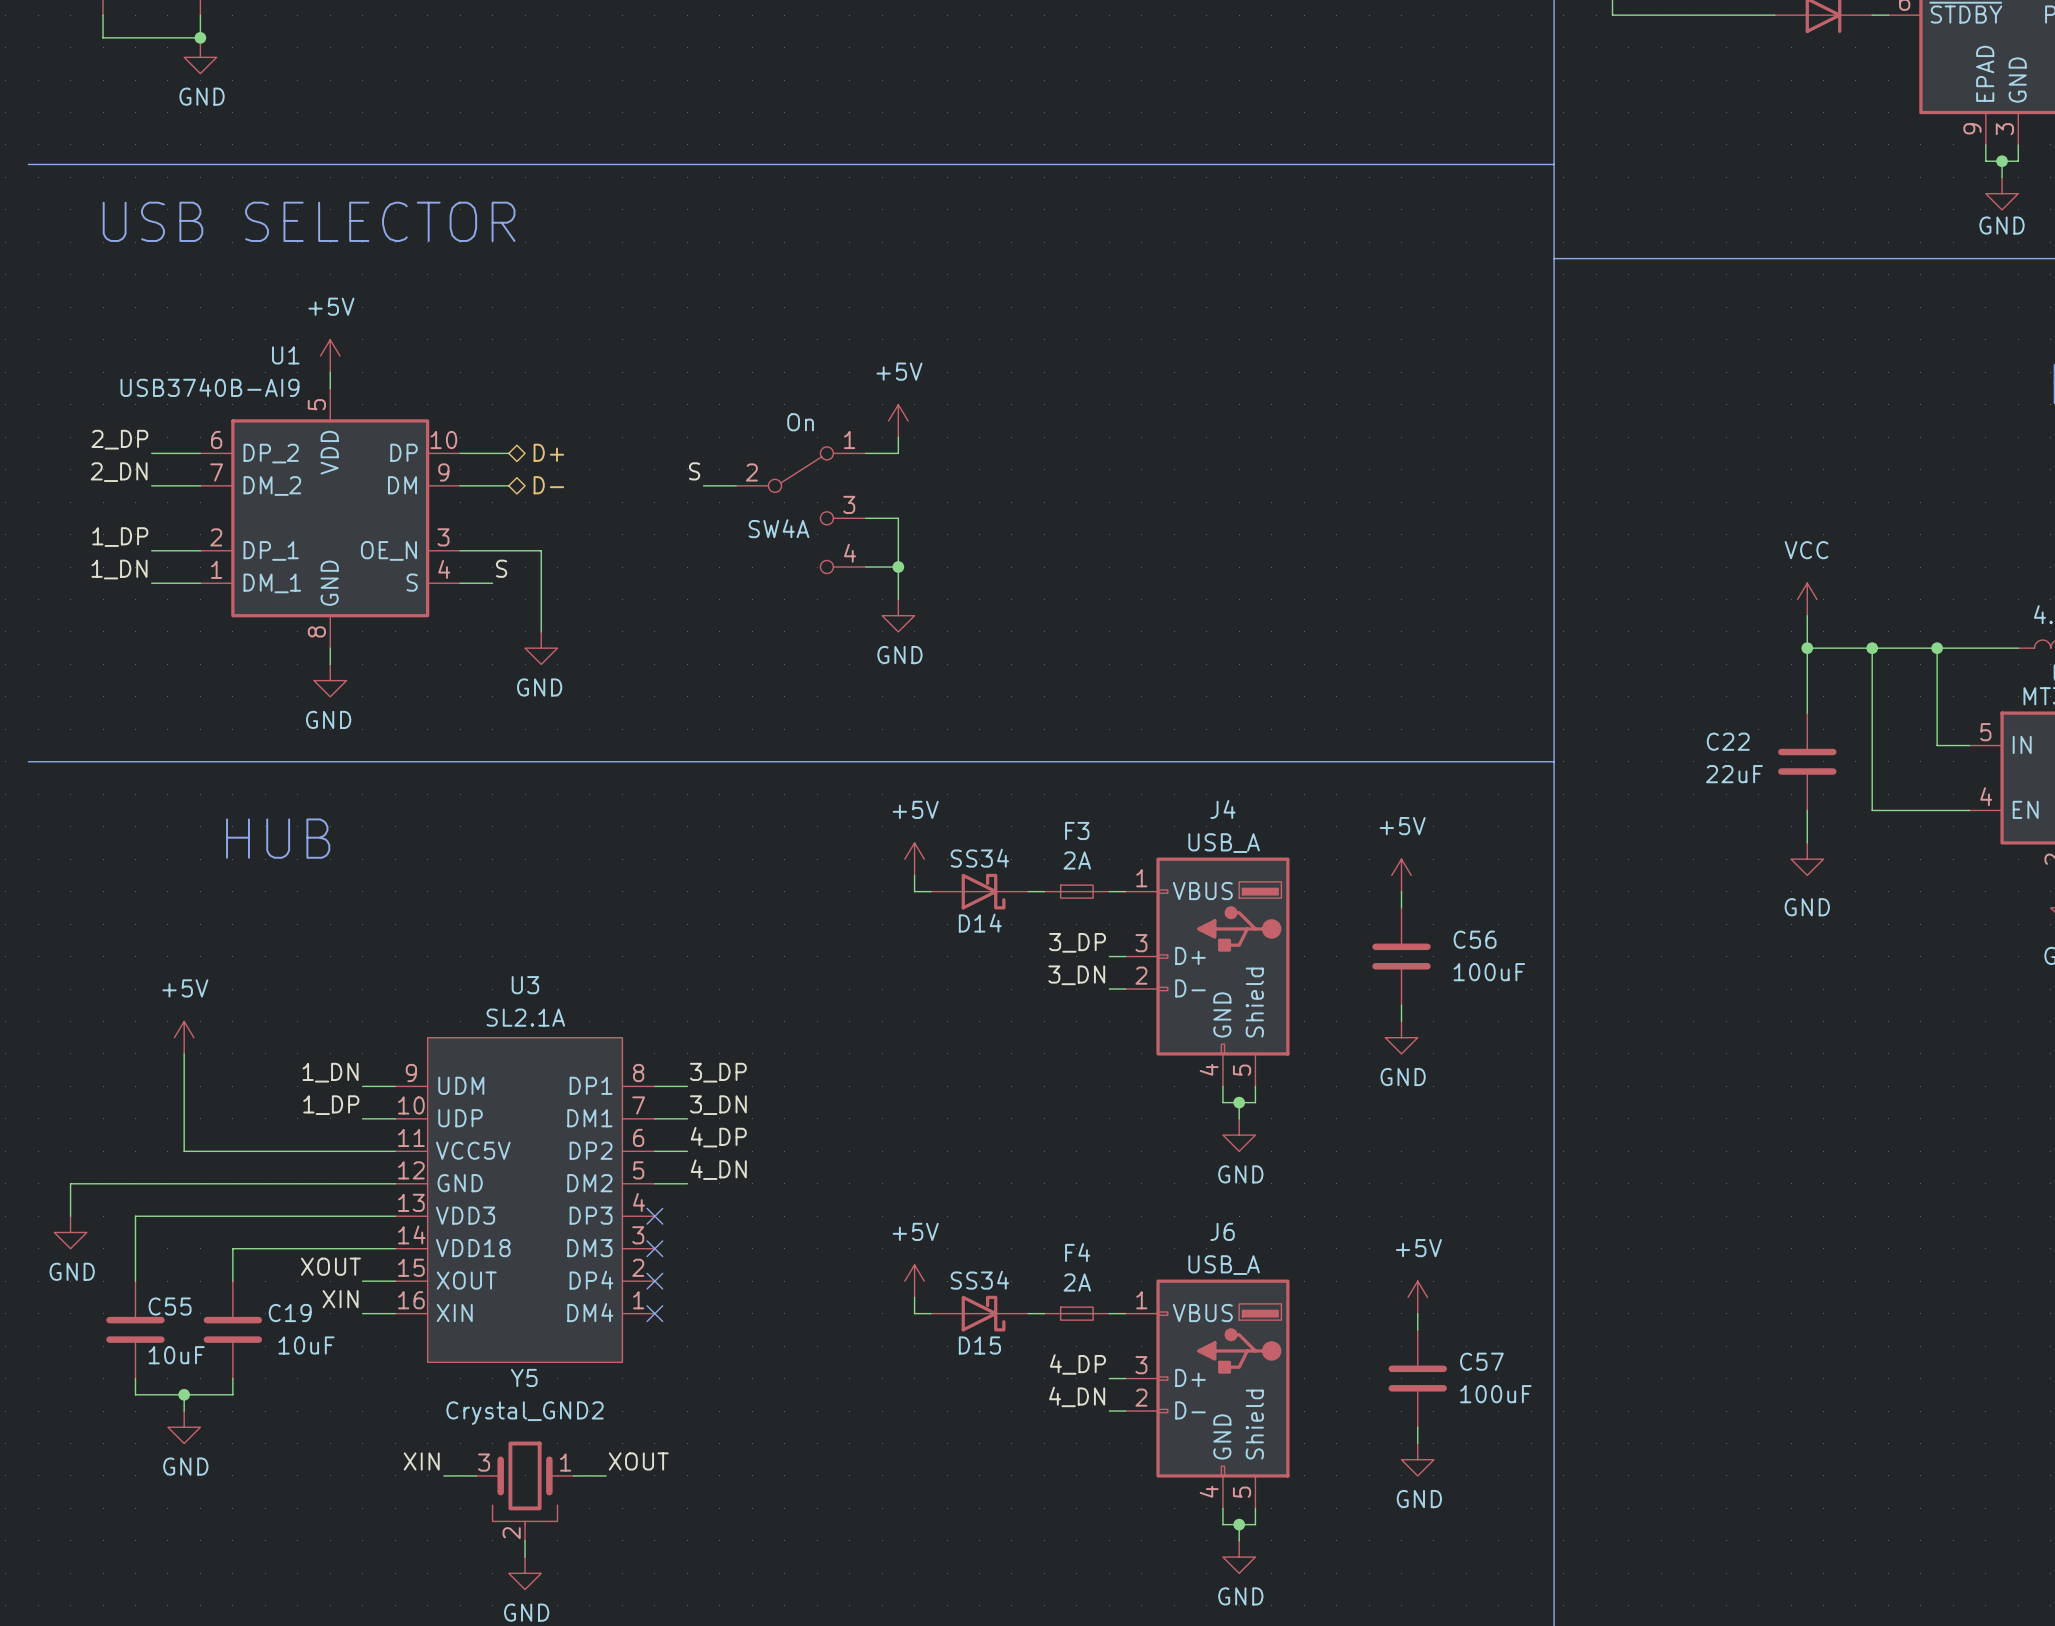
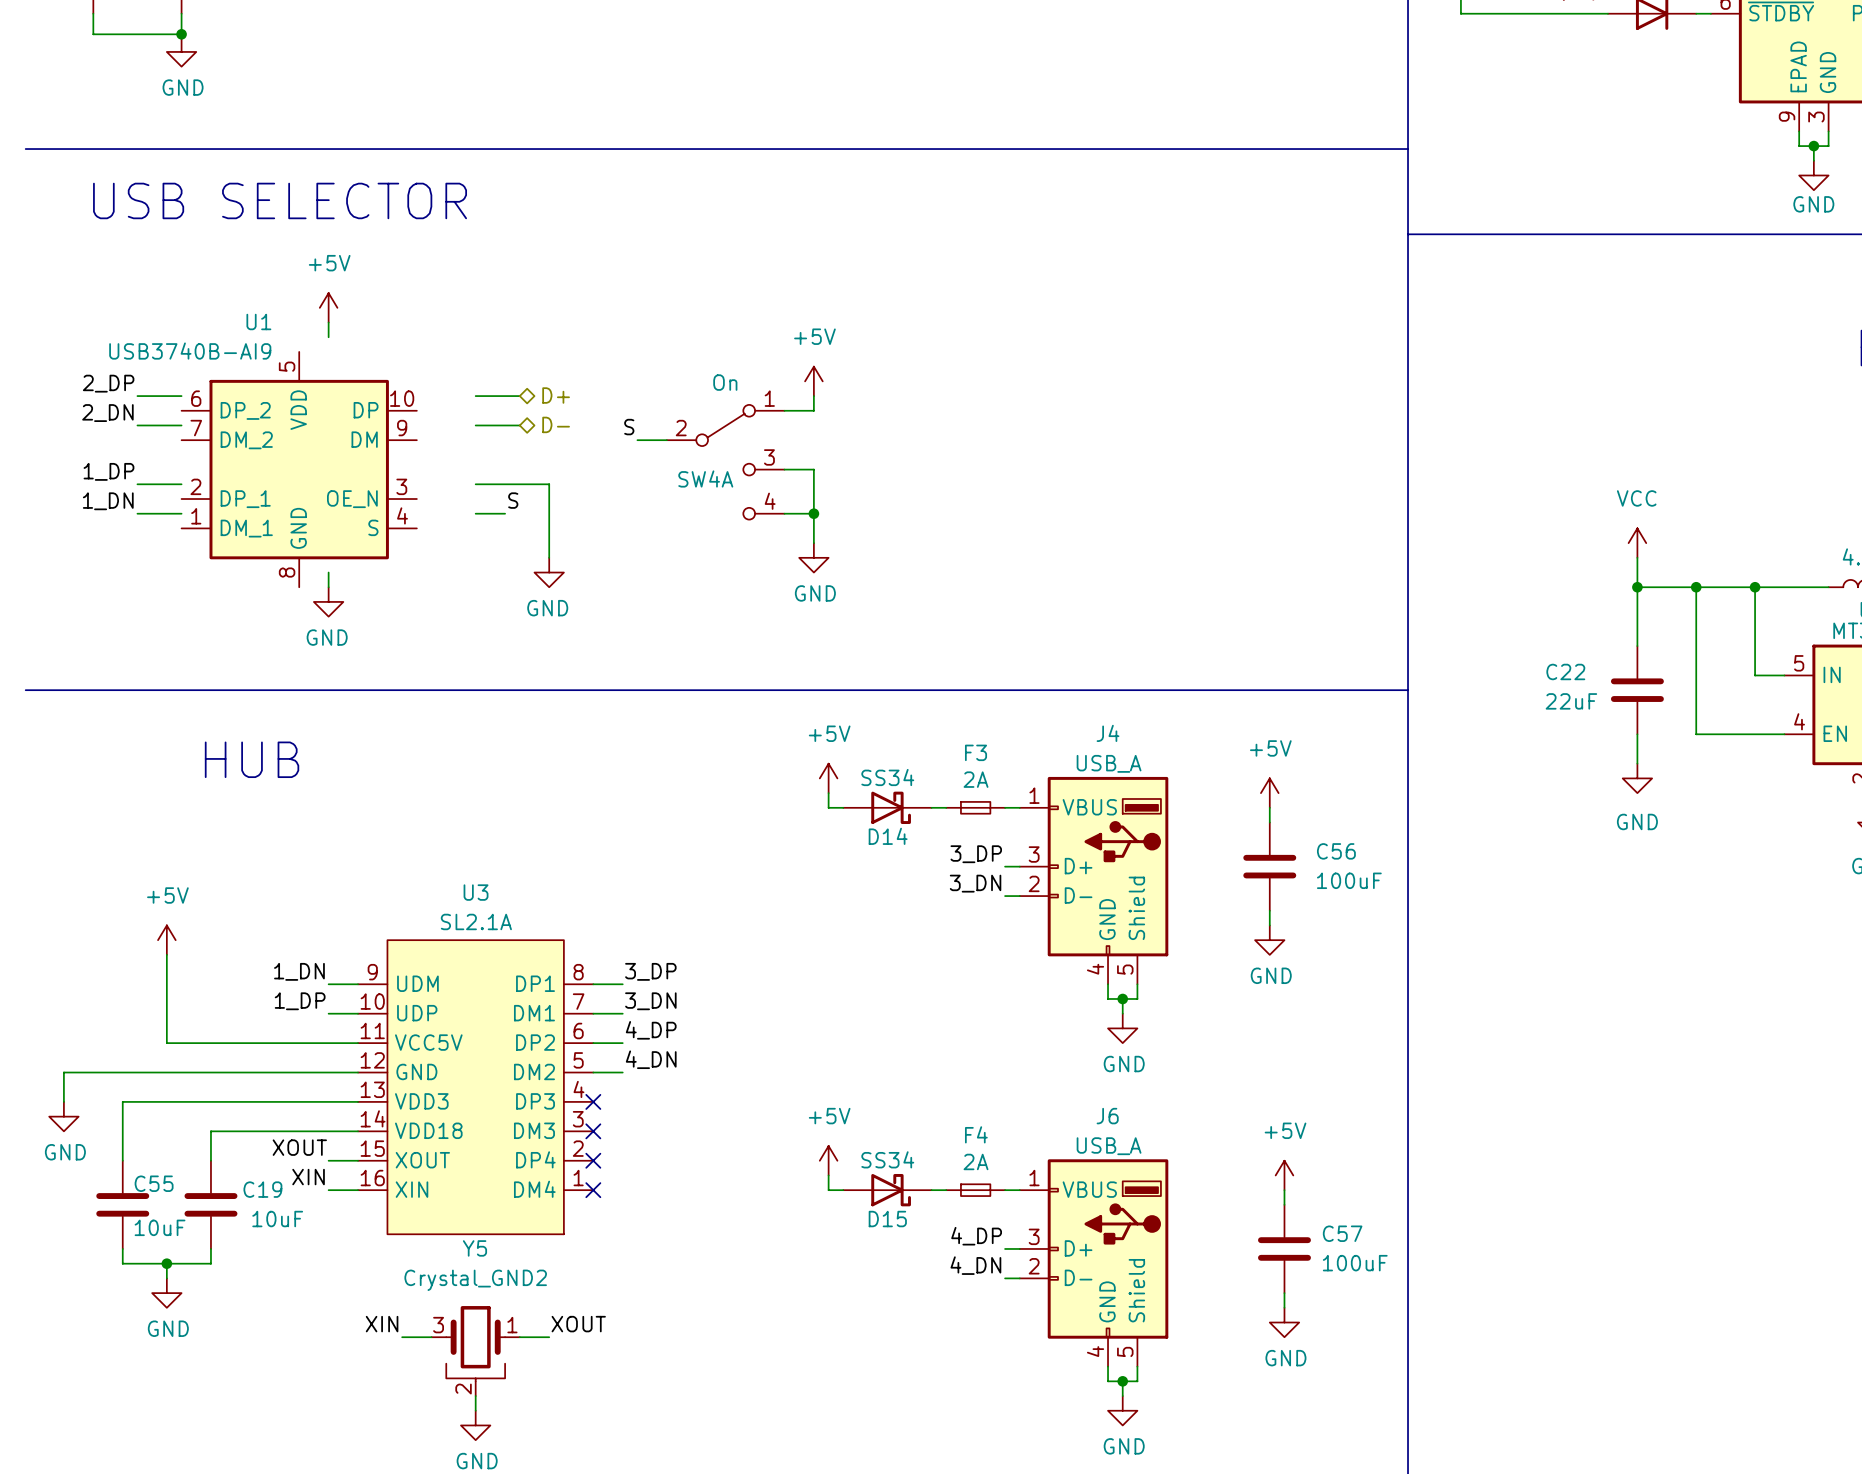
power symbol position: +5V (330, 356) -> +5V (328, 307)
wire: (330, 372) (330, 388) -> (328, 322) (328, 337)
label position: 2_DP (119, 439) -> 2_DP (108, 383)
hierarchical label position: D+ (548, 452) -> D+ (556, 395)
wire: (151, 453) (200, 453) -> (137, 396) (181, 396)
wire: (460, 453) (508, 453) -> (475, 396) (519, 396)
label position: 2_DN (119, 472) -> 2_DN (107, 413)
wire: (151, 485) (200, 485) -> (137, 425) (181, 425)
wire: (460, 485) (508, 485) -> (475, 425) (519, 425)
hierarchical label position: D- (548, 485) -> D- (556, 424)
label position: 1_DP (120, 537) -> 1_DP (108, 471)
wire: (151, 550) (200, 550) -> (137, 484) (181, 484)
wire: (460, 550) (541, 550) (541, 631) -> (475, 484) (549, 484) (549, 557)
label position: S (501, 568) -> S (513, 500)
label position: 1_DN (119, 569) -> 1_DN (108, 501)
wire: (151, 583) (200, 583) -> (137, 513) (181, 513)
wire: (460, 583) (492, 583) -> (475, 513) (505, 513)
wire: (330, 648) (330, 664) -> (328, 572) (328, 587)
power symbol position: GND (541, 648) -> GND (549, 572)
power symbol position: GND (330, 680) -> GND (328, 601)

